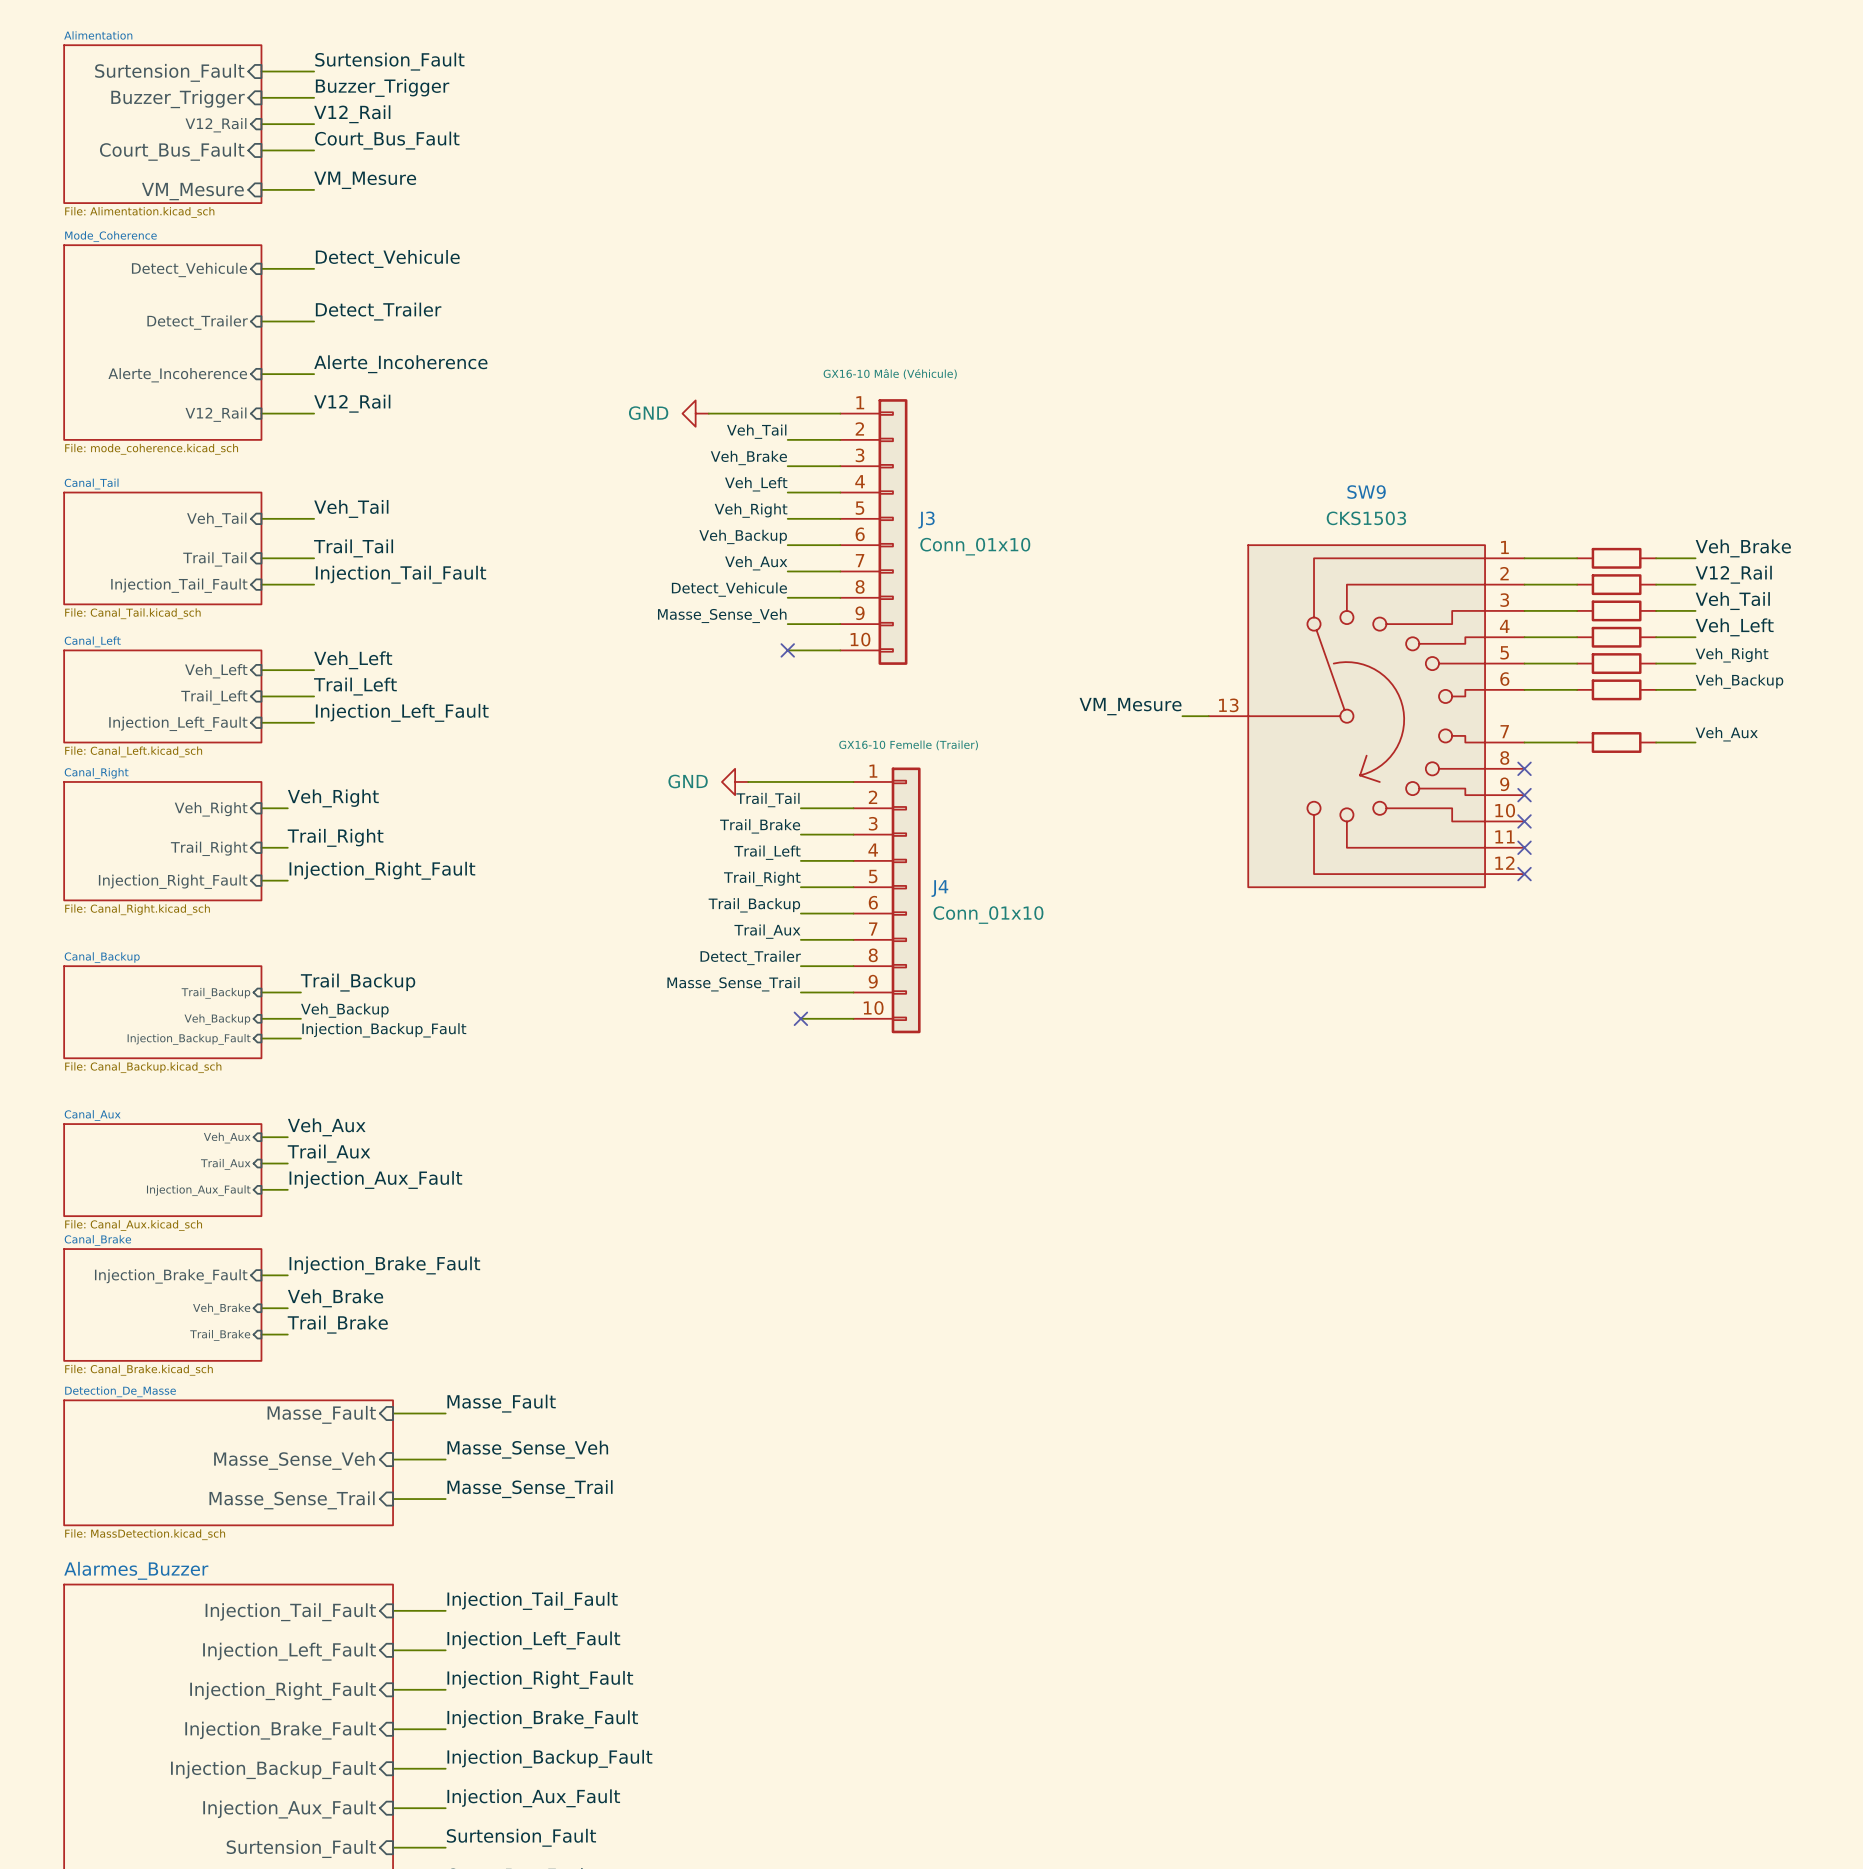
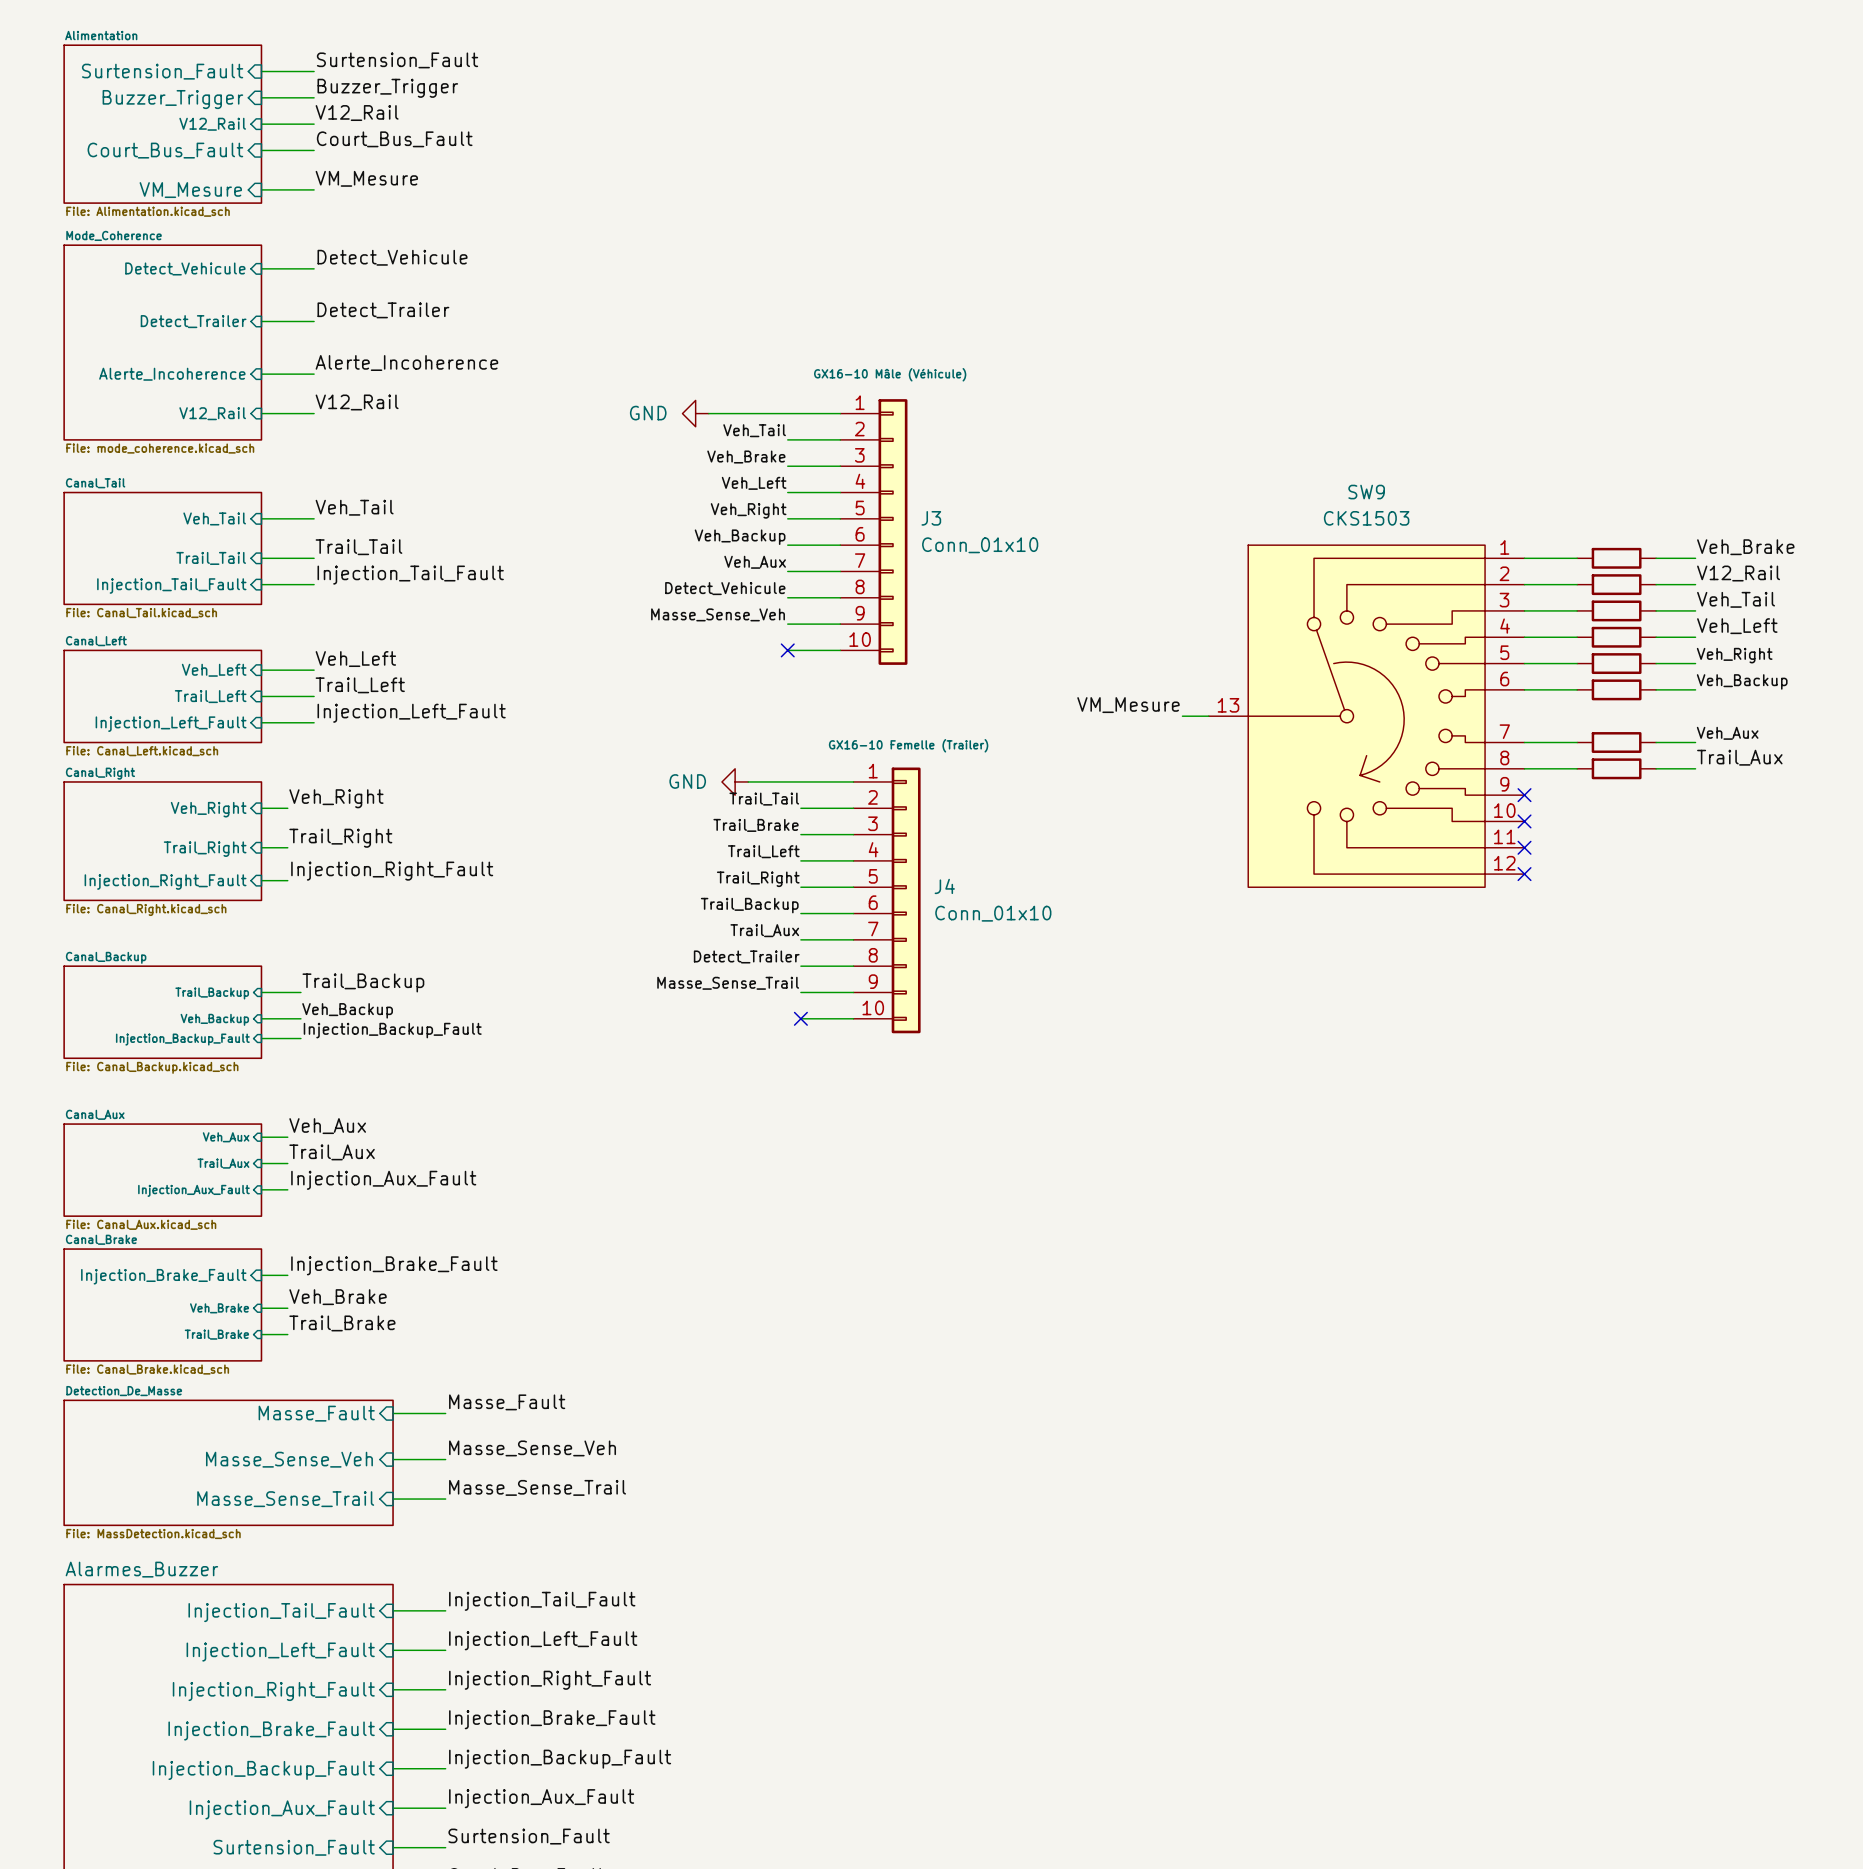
label: none -> Trail_Aux (1739, 757)
wire: none -> (1524, 768) (1577, 768)
no-connect mark: (1524, 768) -> none
part: none -> (1616, 768)
wire: none -> (1656, 768) (1695, 768)

